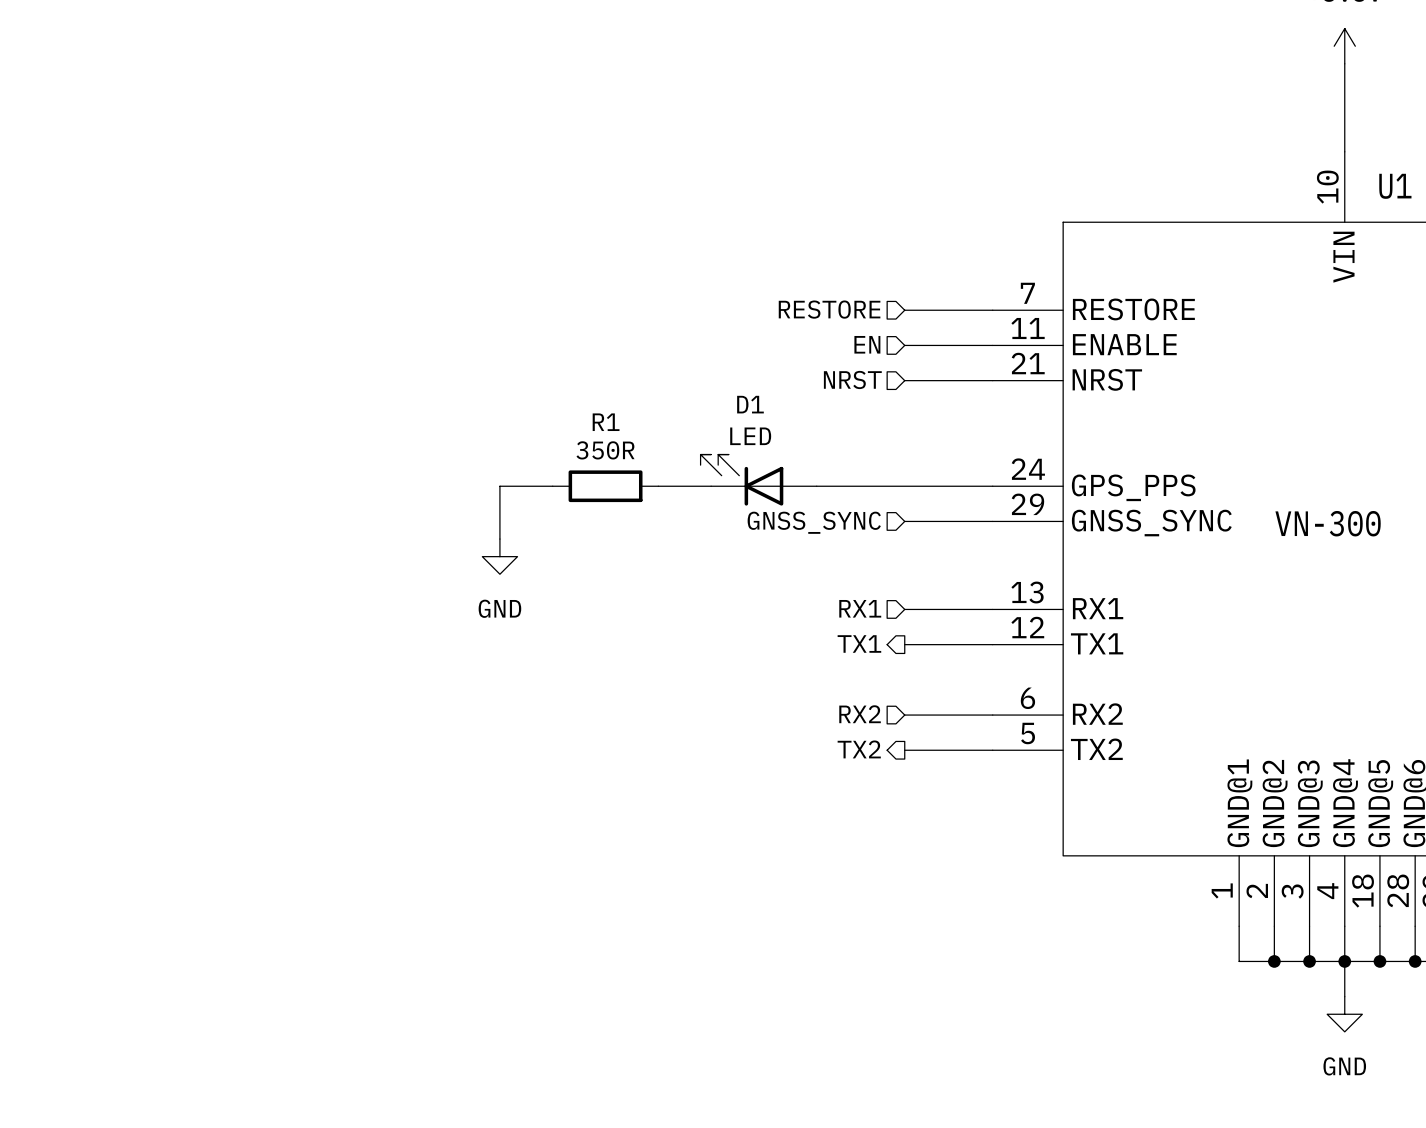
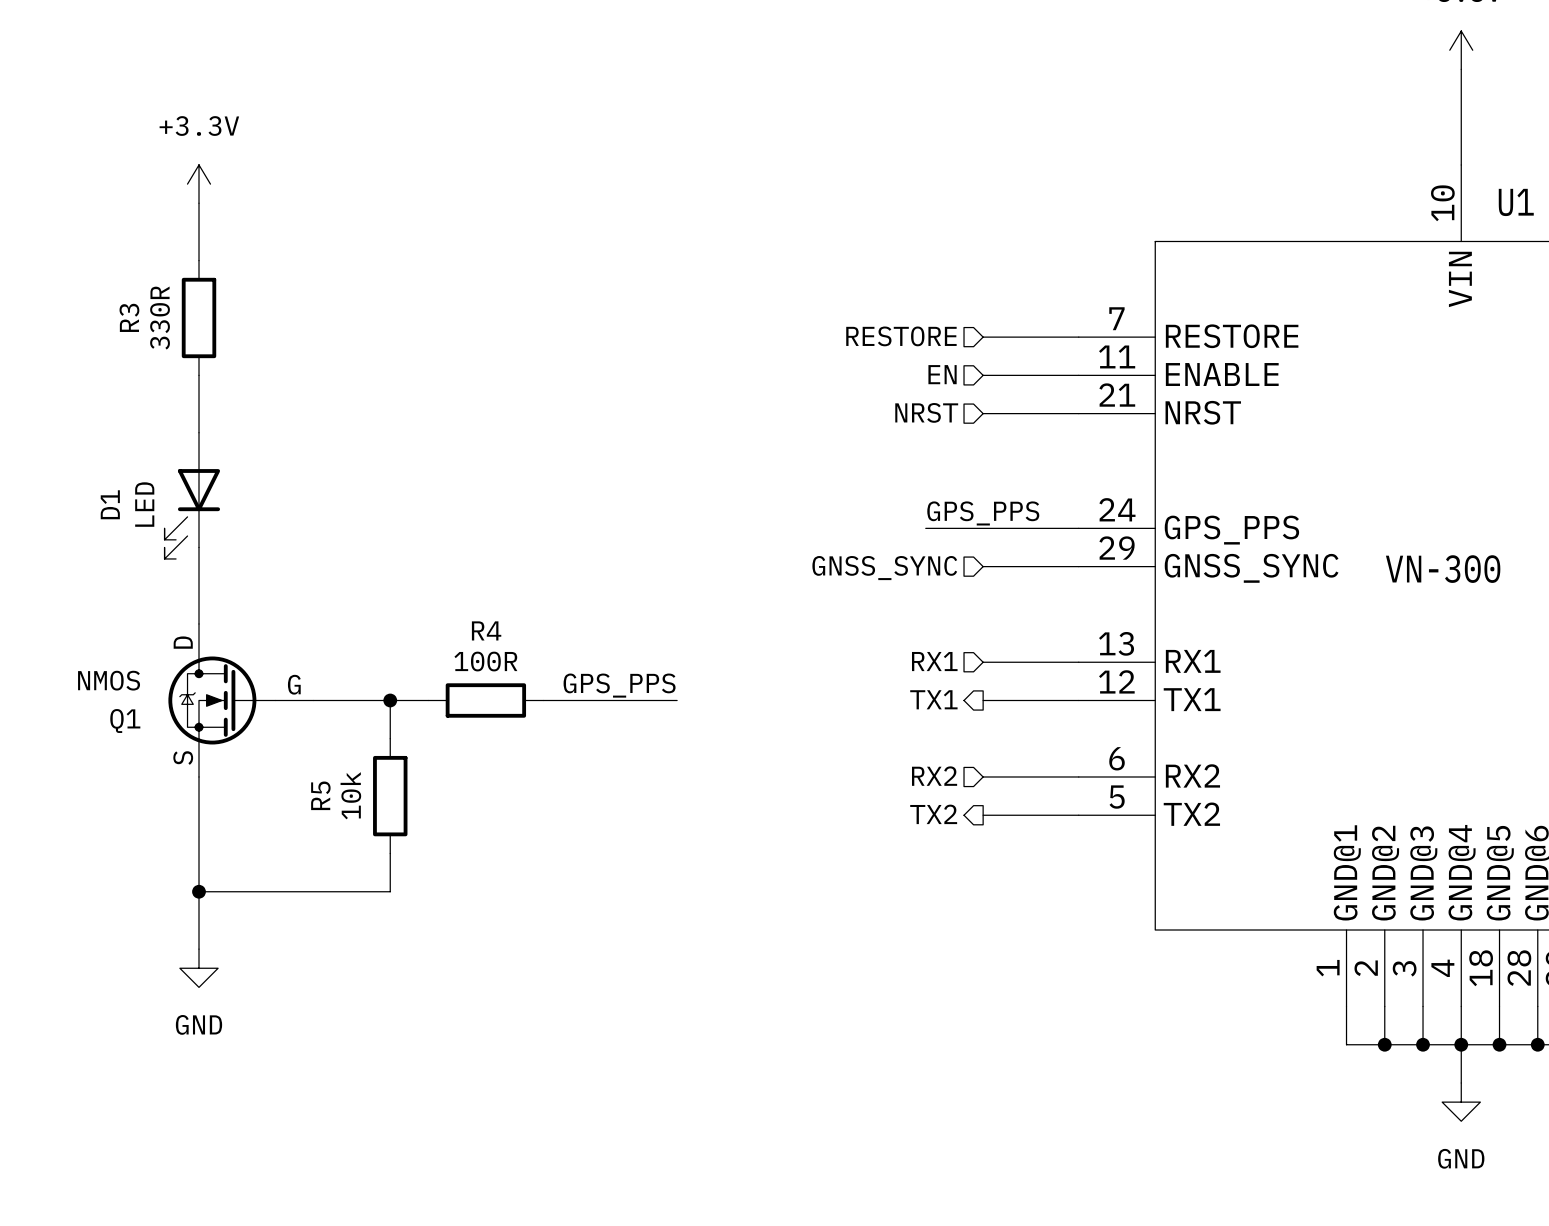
power symbol: none -> +3.3V (199, 184)
wire: none -> (199, 203) (199, 260)
R3: none -> 330R (199, 317)
wire: none -> (199, 375) (199, 432)
label: none -> GPS_PPS (983, 513)
D1 rotation: 0° (741, 480) -> 90° counterclockwise (192, 514)
D1 position: (758, 480) -> (192, 495)
wire: (552, 486) (499, 486) (499, 539) -> none
R1: 350R (605, 486) -> none
wire: (658, 486) (711, 486) -> none
wire: (816, 486) (851, 486) -> none
wire: none -> (199, 547) (199, 623)
power symbol: GND (499, 556) -> none
label: none -> GPS_PPS (619, 685)
Q1: none -> NMOS (241, 700)
wire: none -> (313, 700) (428, 700)
wire: none -> (390, 700) (390, 738)
junction: none -> (390, 700)
R4: none -> 100R (485, 700)
wire: none -> (543, 700) (677, 700)
wire: none -> (199, 776) (199, 949)
R5: none -> 10k (390, 796)
wire: none -> (390, 853) (390, 891) (199, 891)
junction: none -> (199, 891)
power symbol: none -> GND (199, 968)

